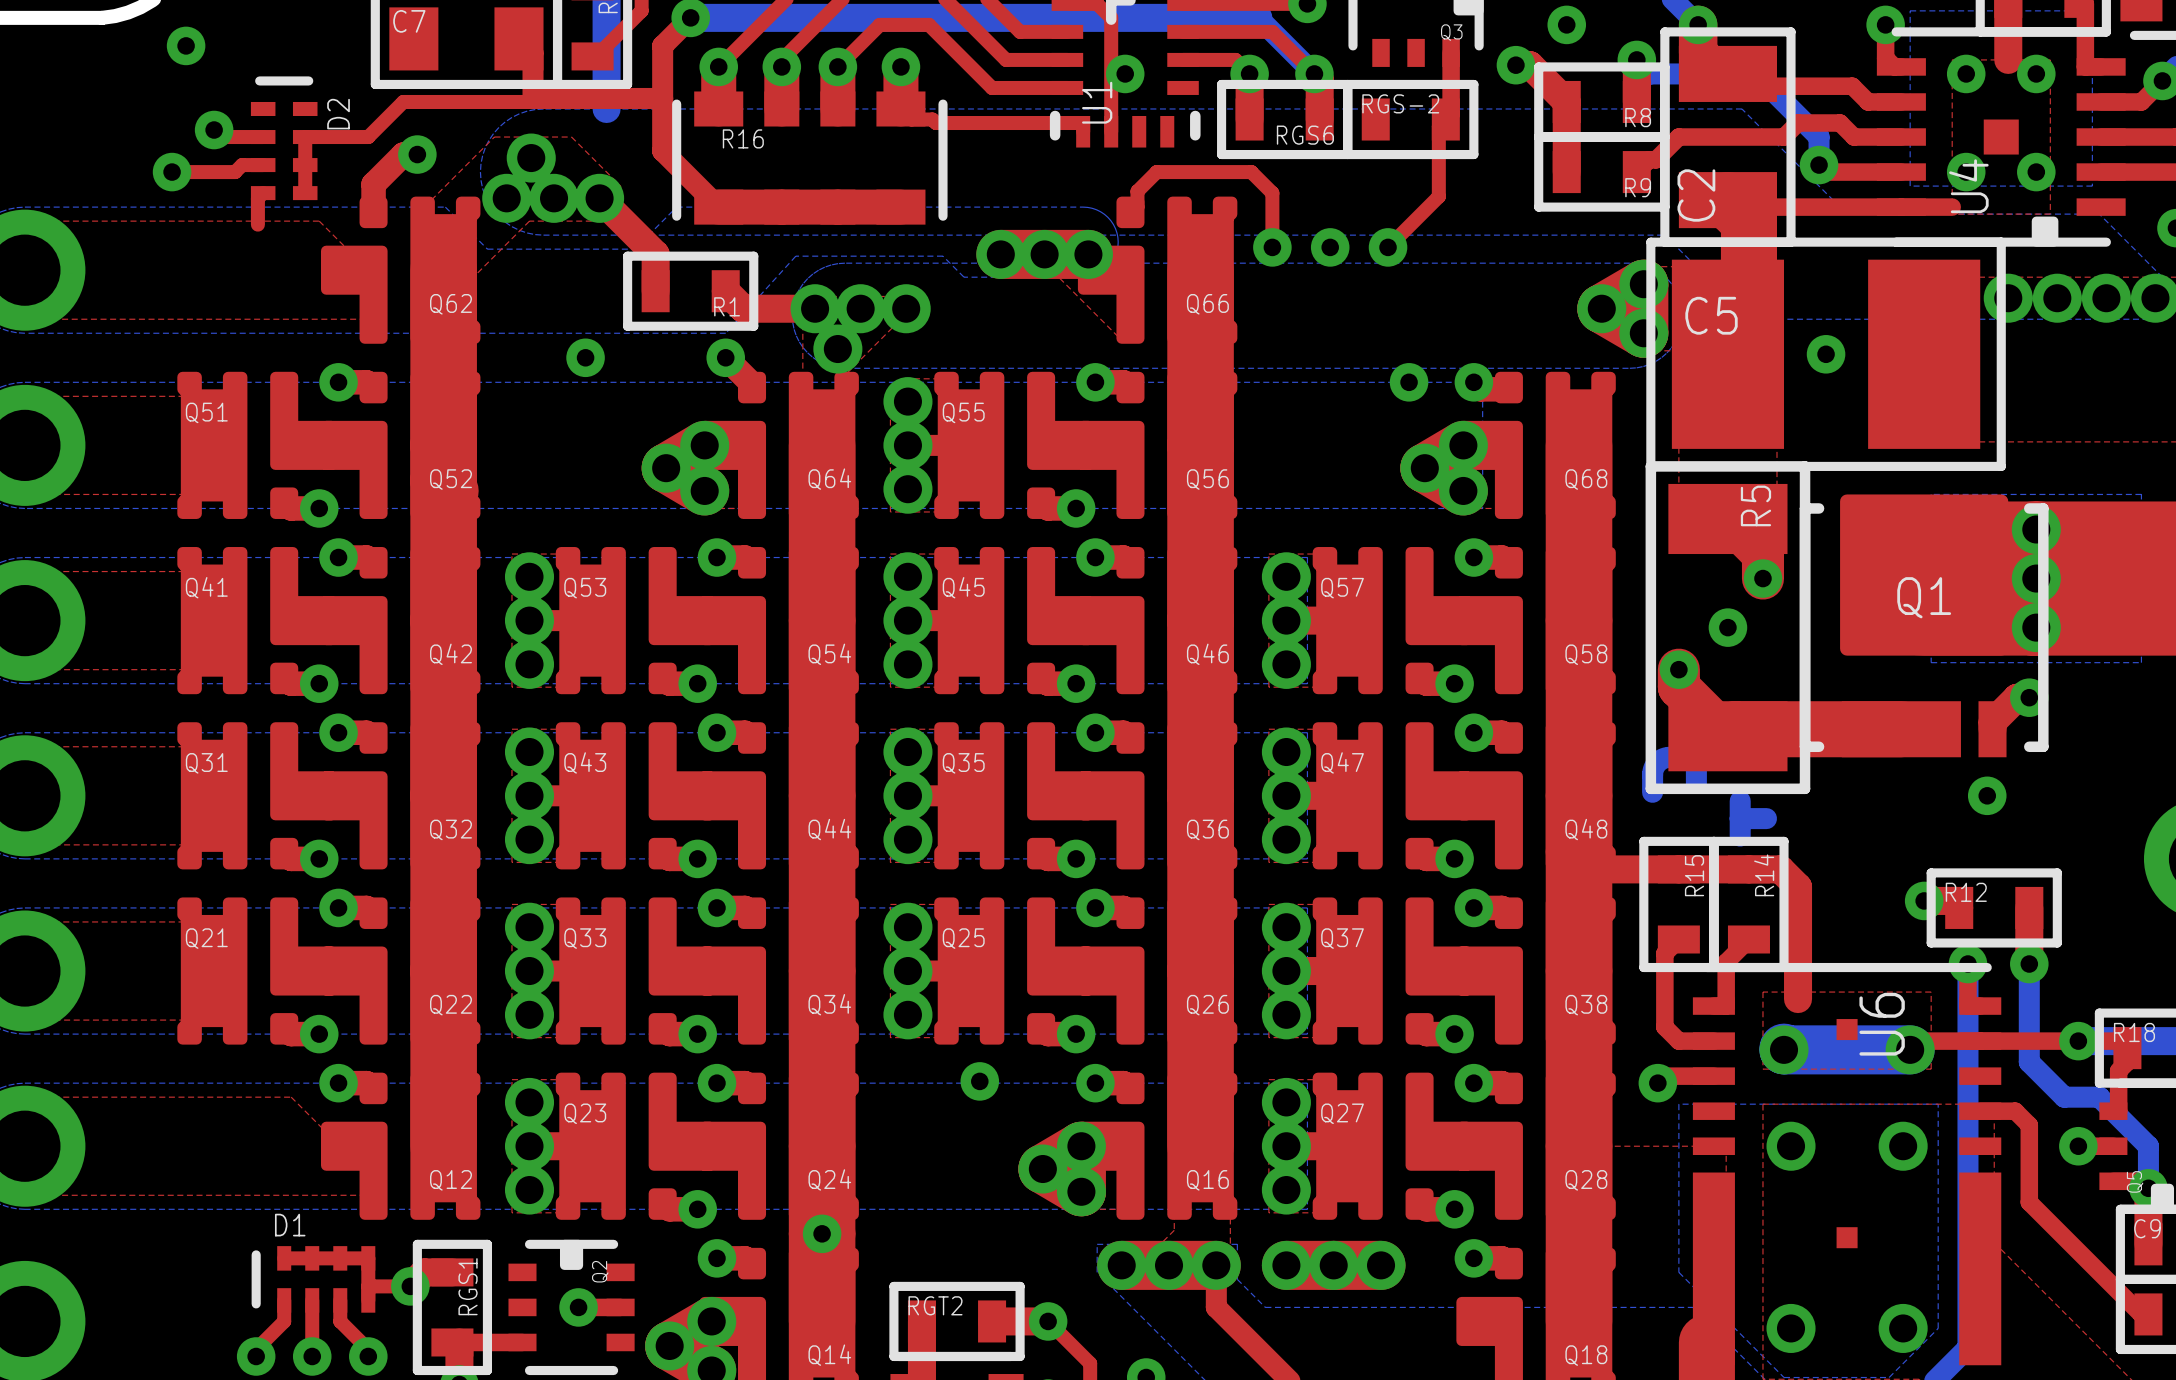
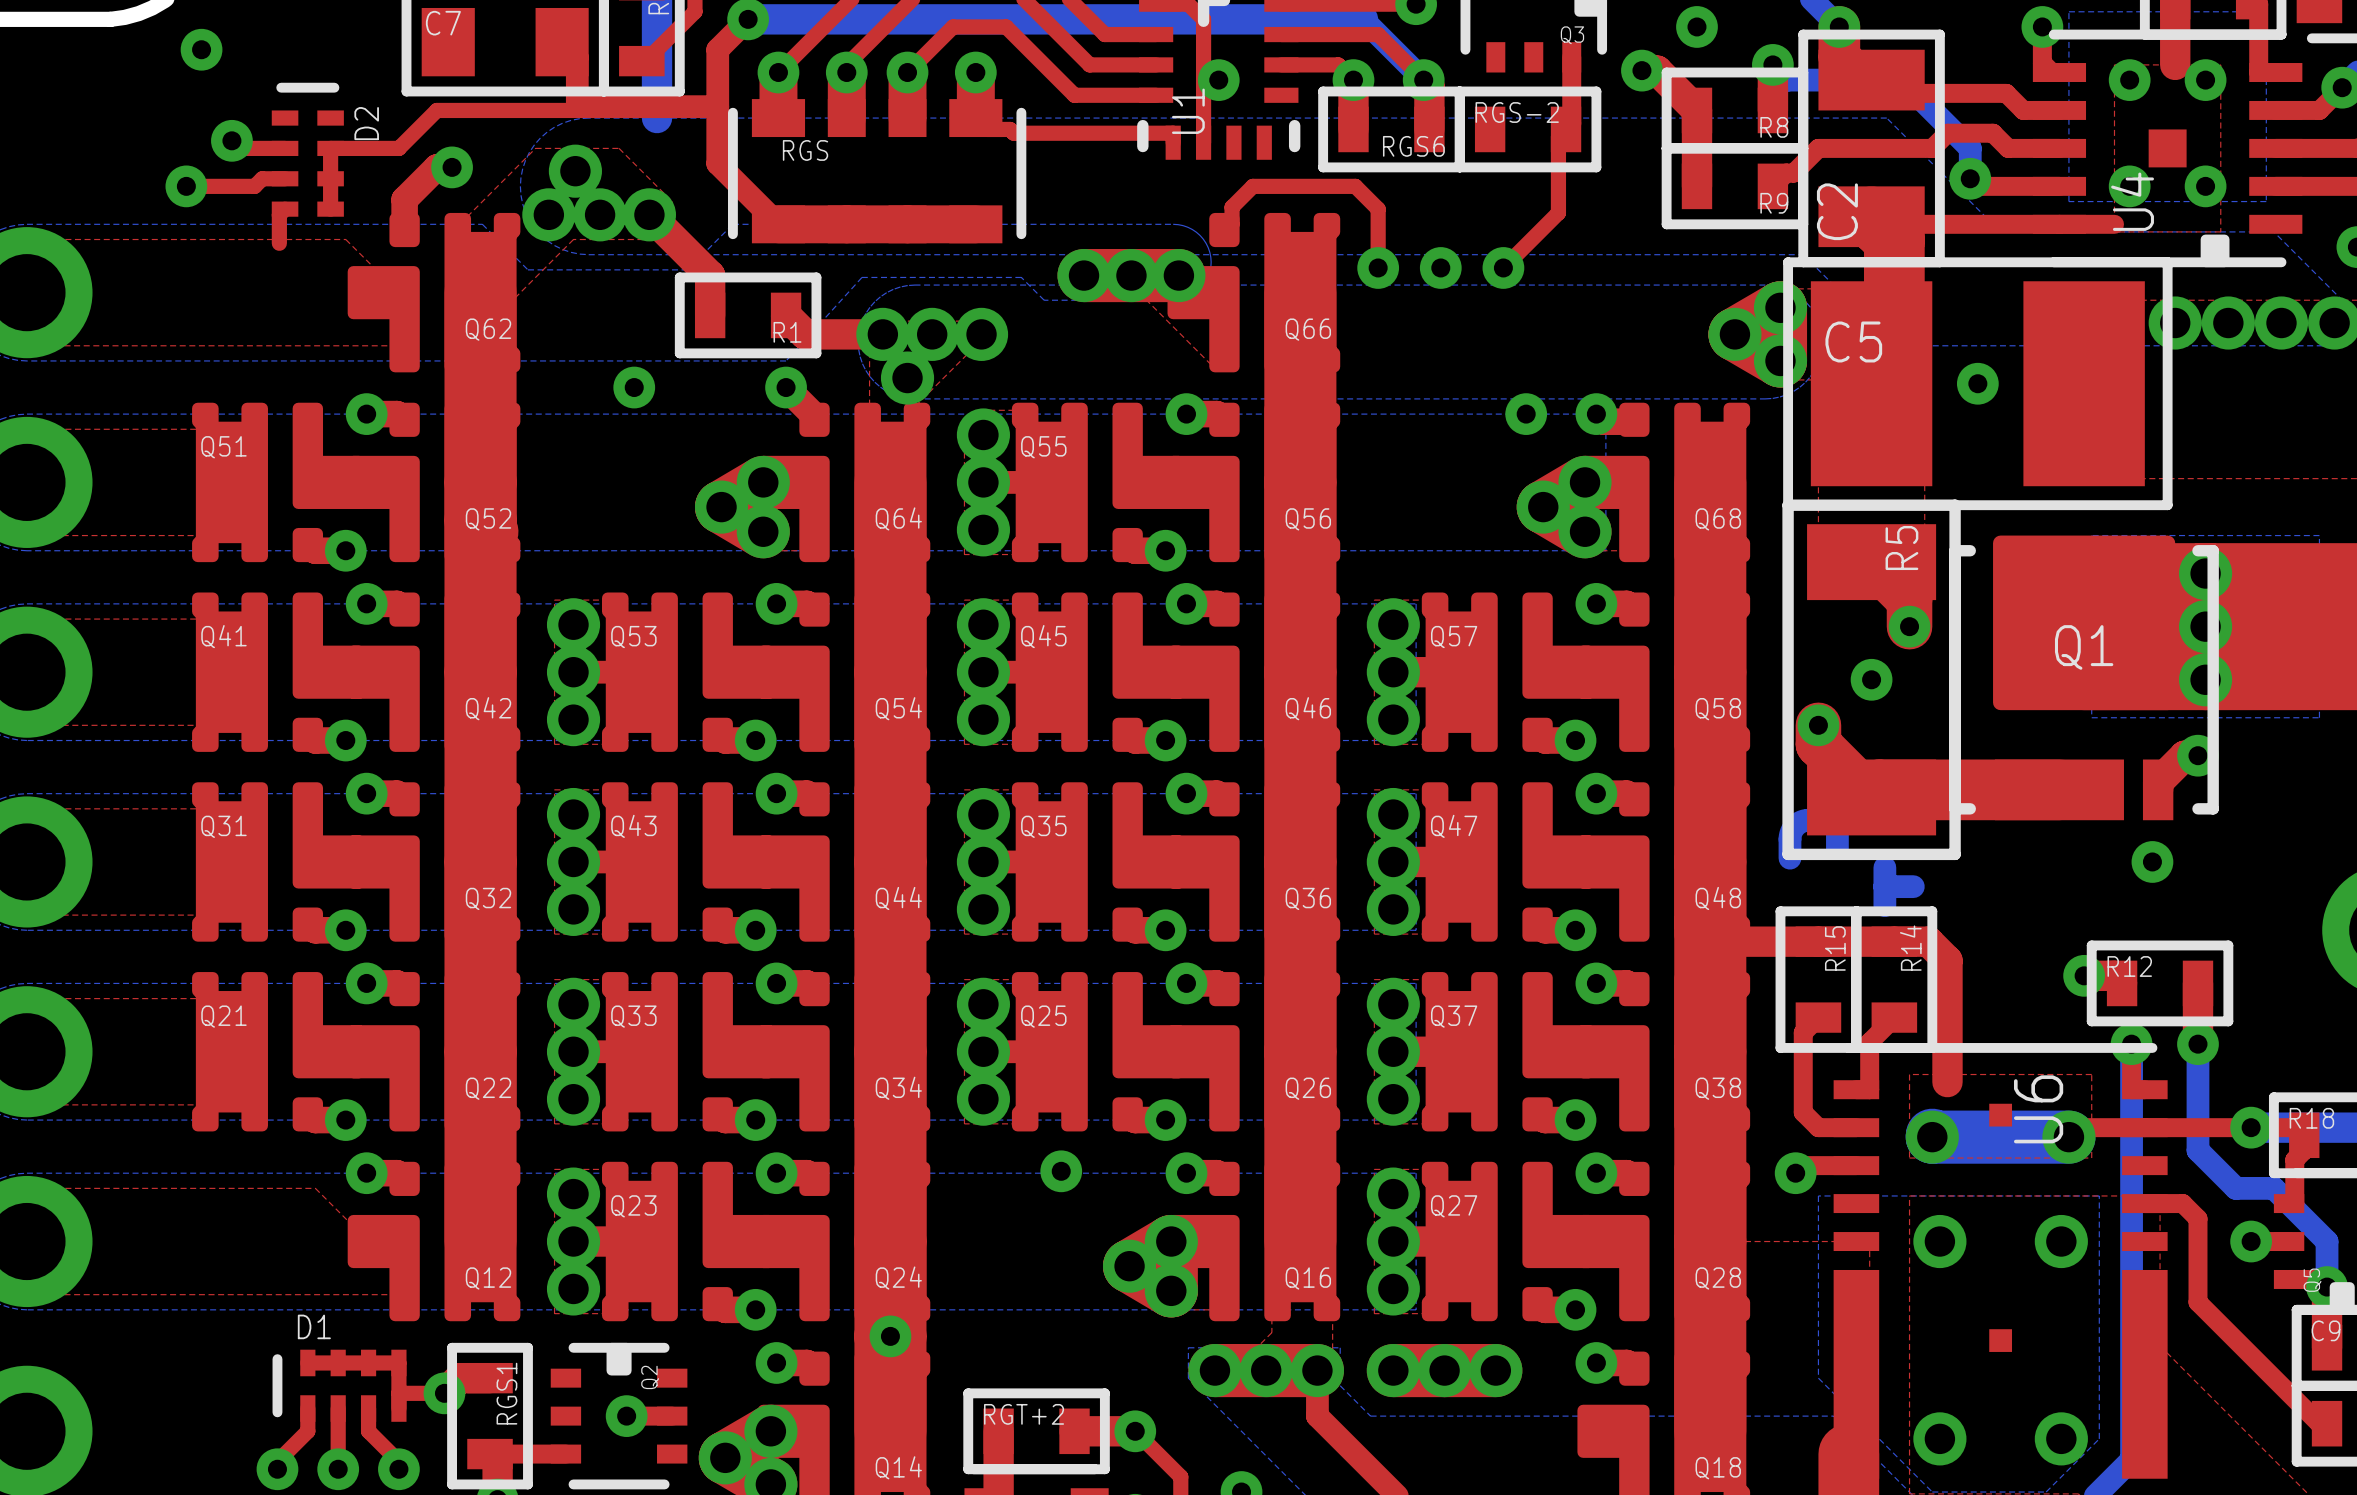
R16 name: R16 (743, 138) -> RGS (805, 150)
RGT2 name: RGT2 (935, 1305) -> RGT+2 (1024, 1414)

